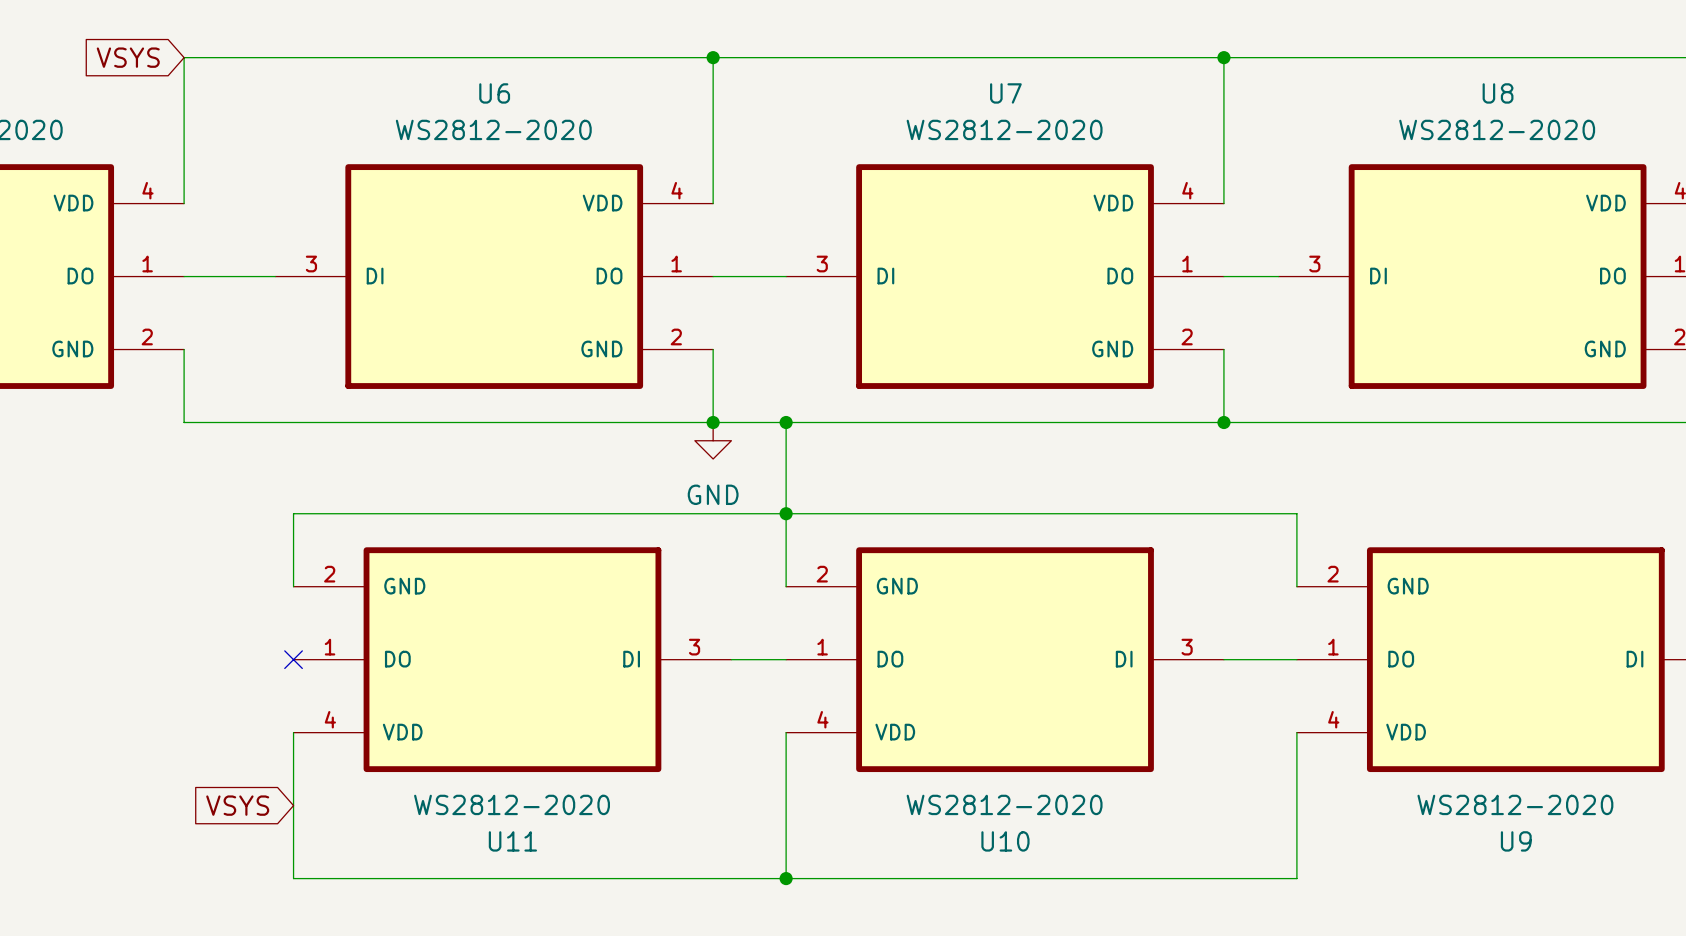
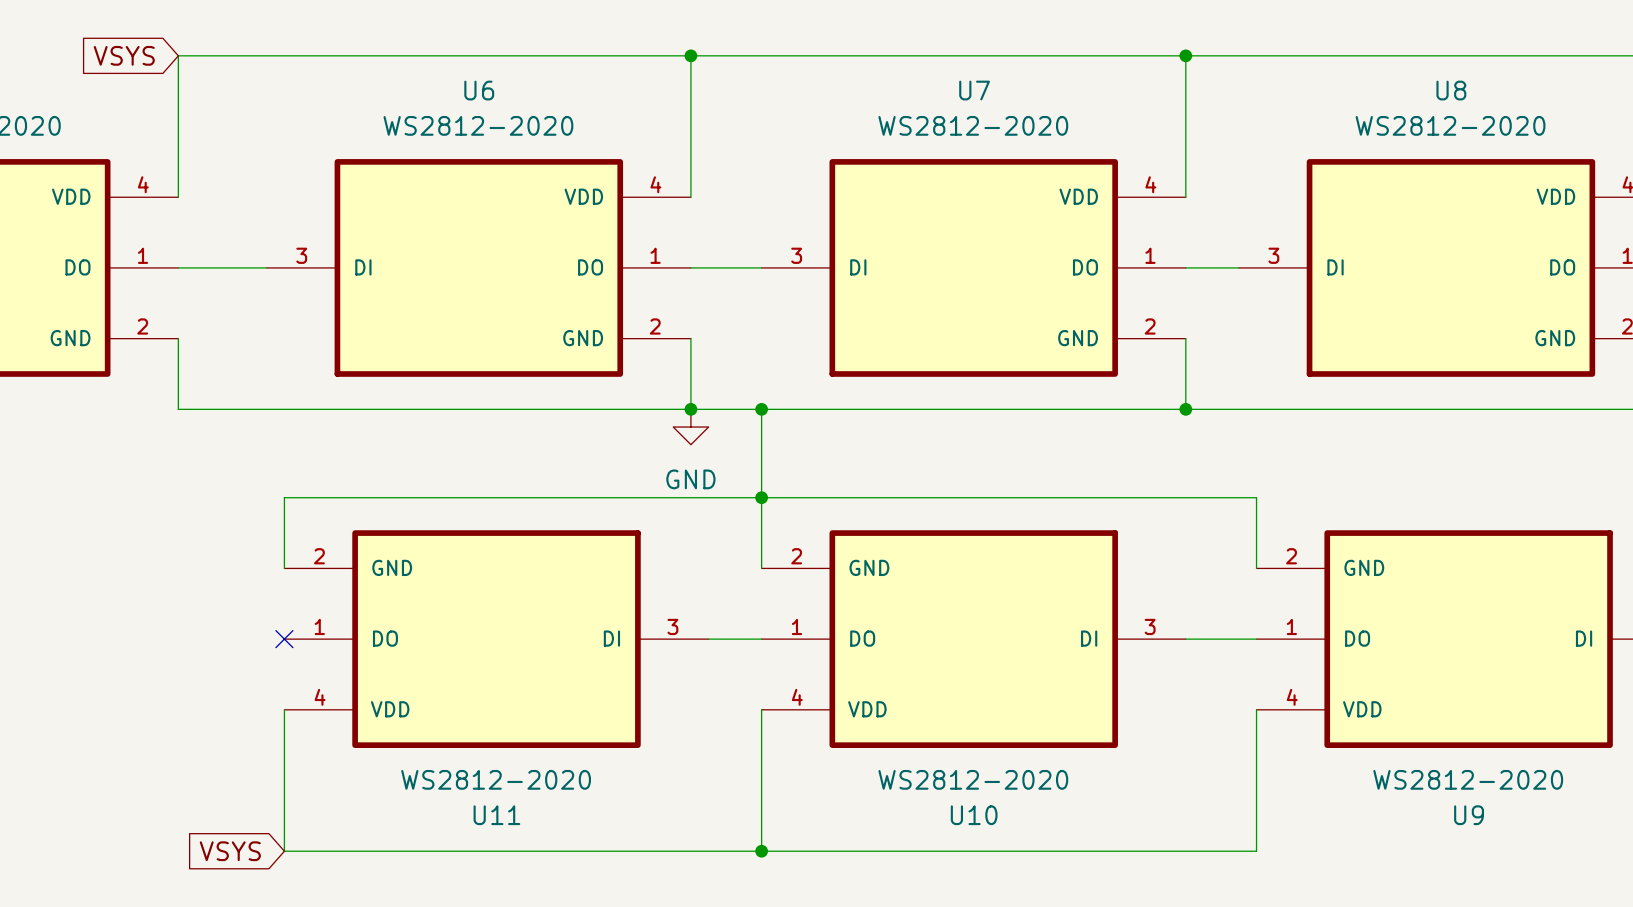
global label position: VSYS (237, 805) -> VSYS (230, 851)

